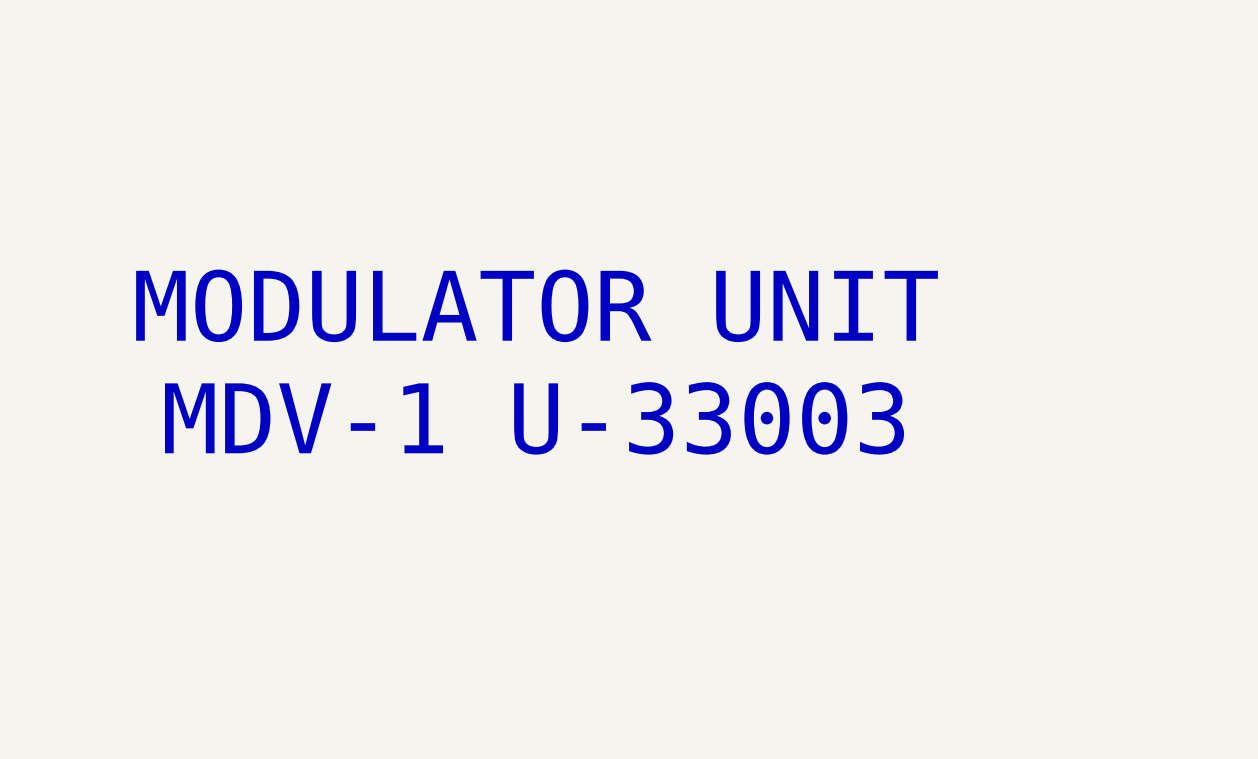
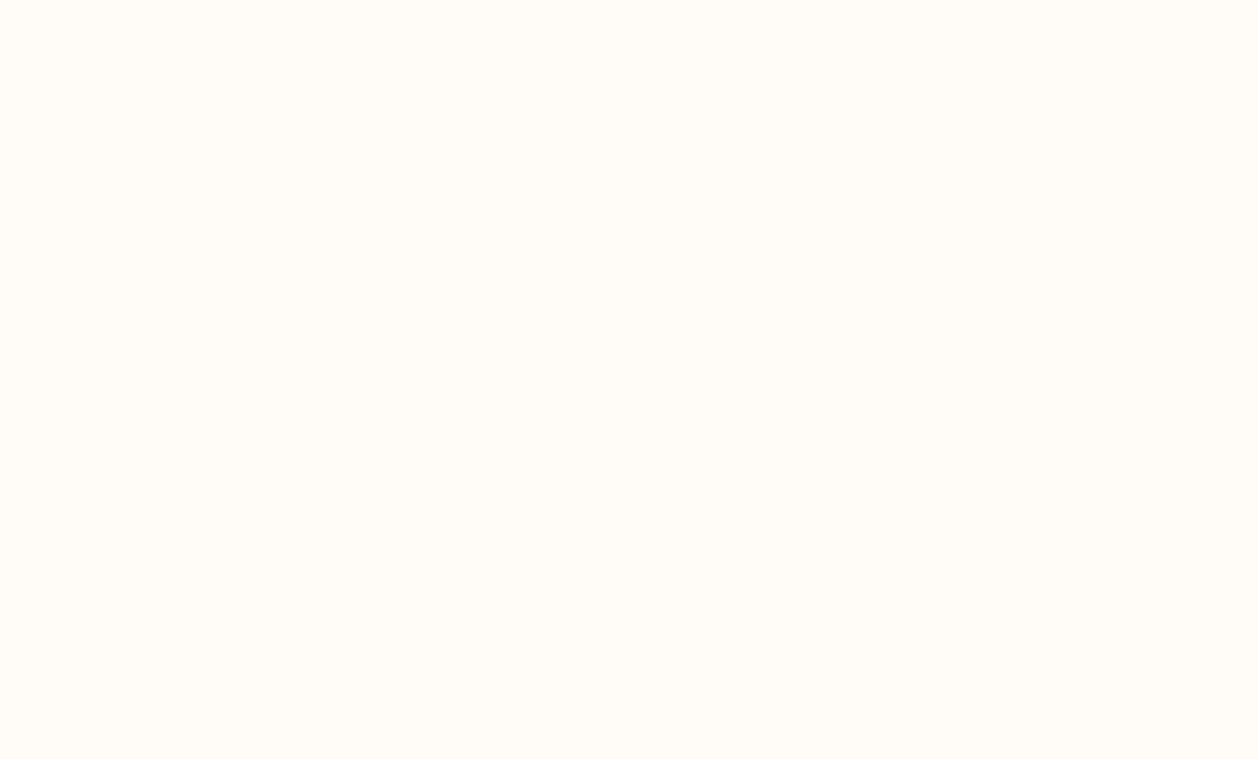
text: MODULATOR UNIT (537, 305) -> none
text: MDV-1 U-33003 (534, 418) -> none

